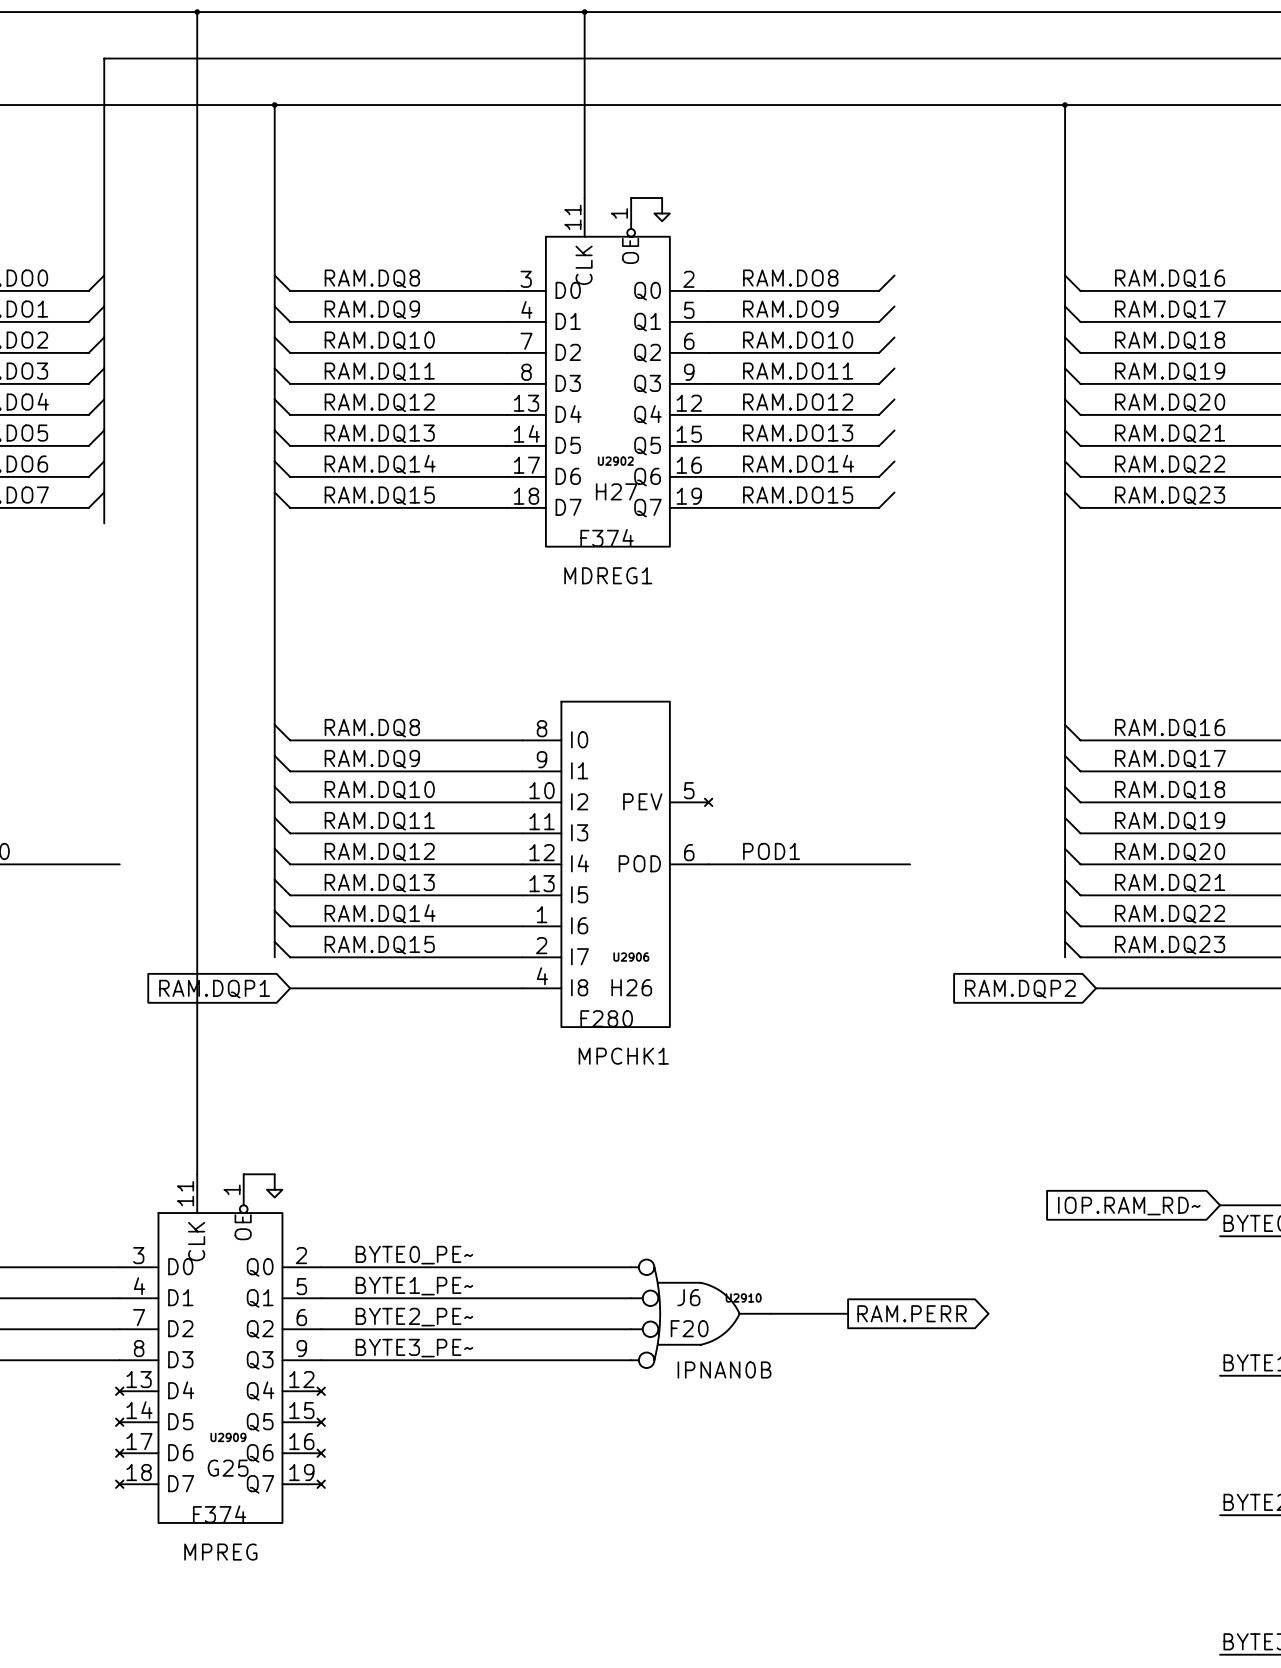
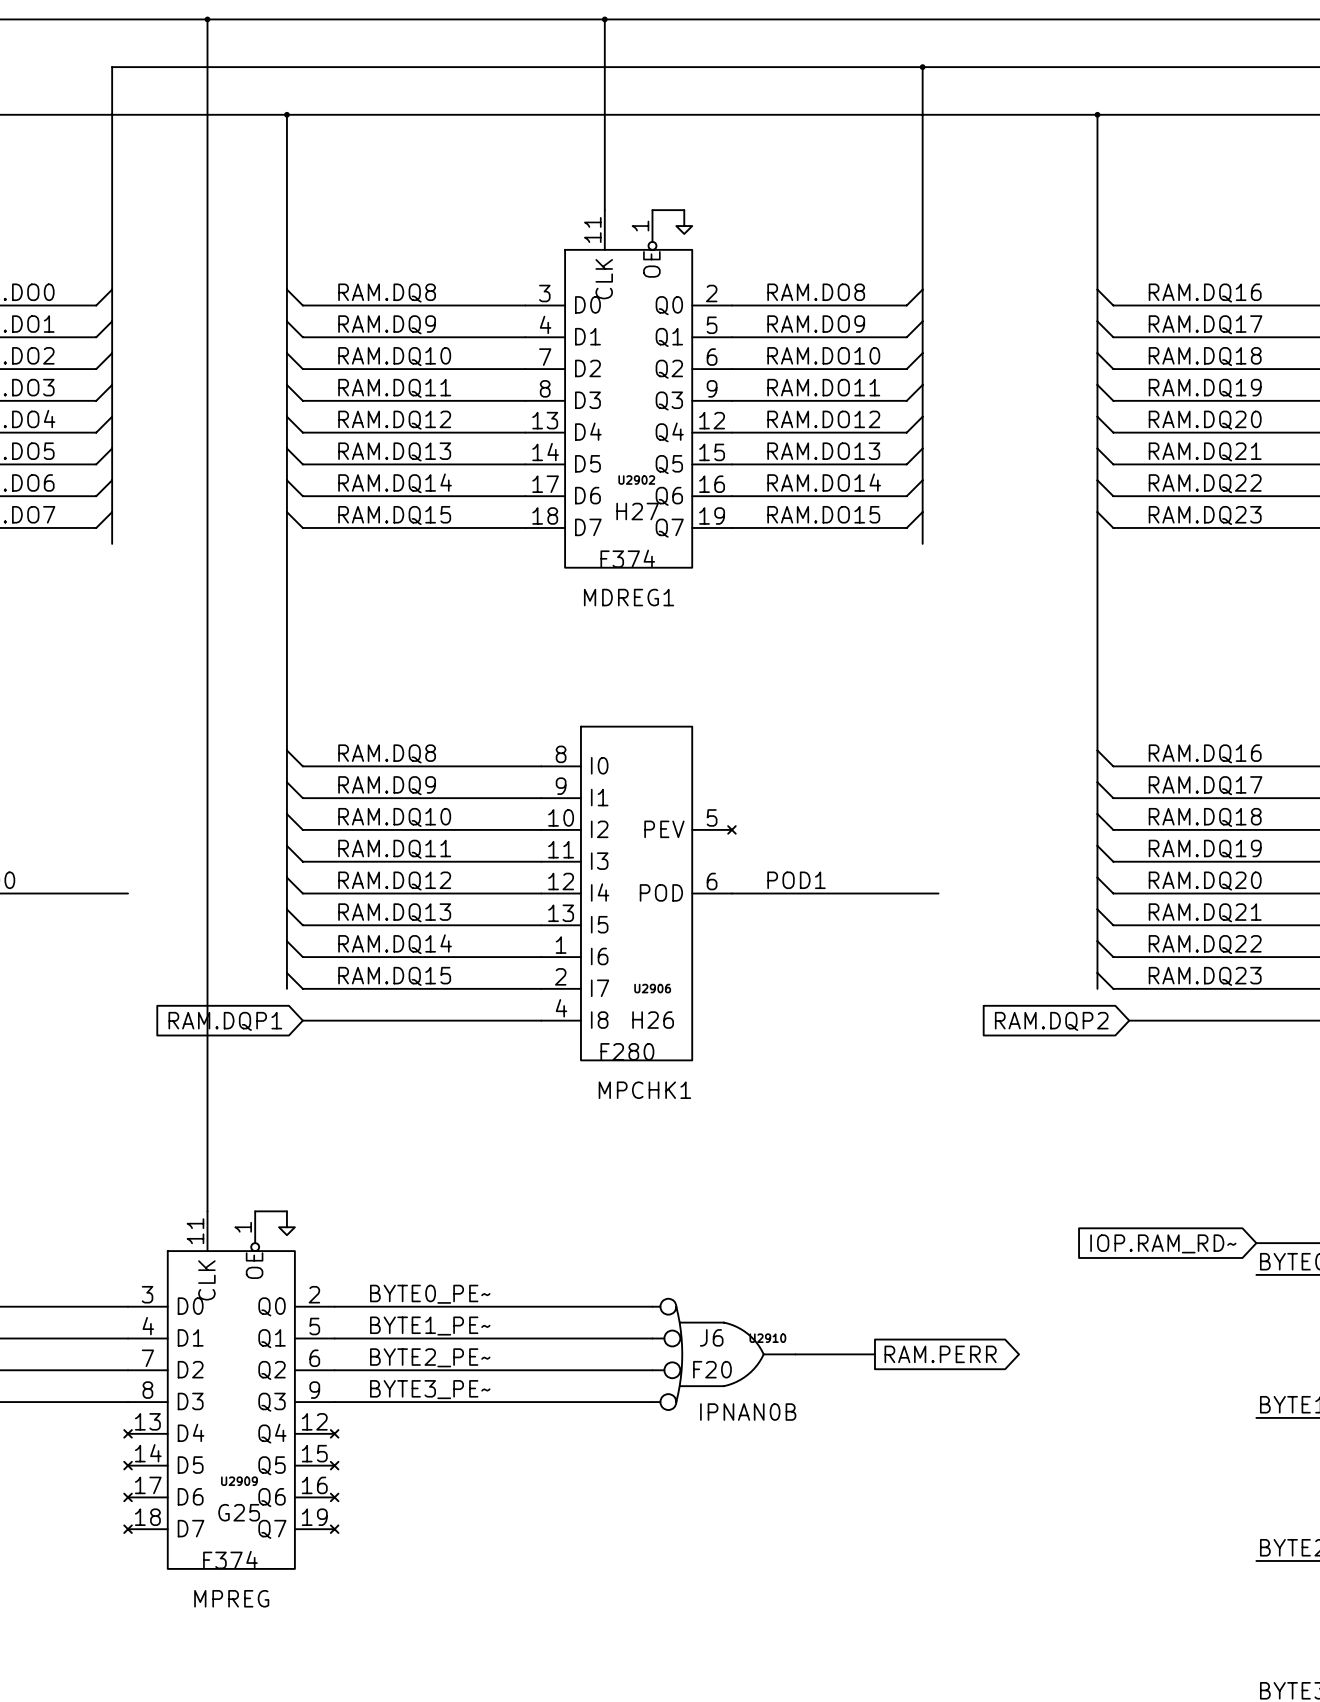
bus: none -> (922, 67) (922, 543)
junction: none -> (922, 67)

